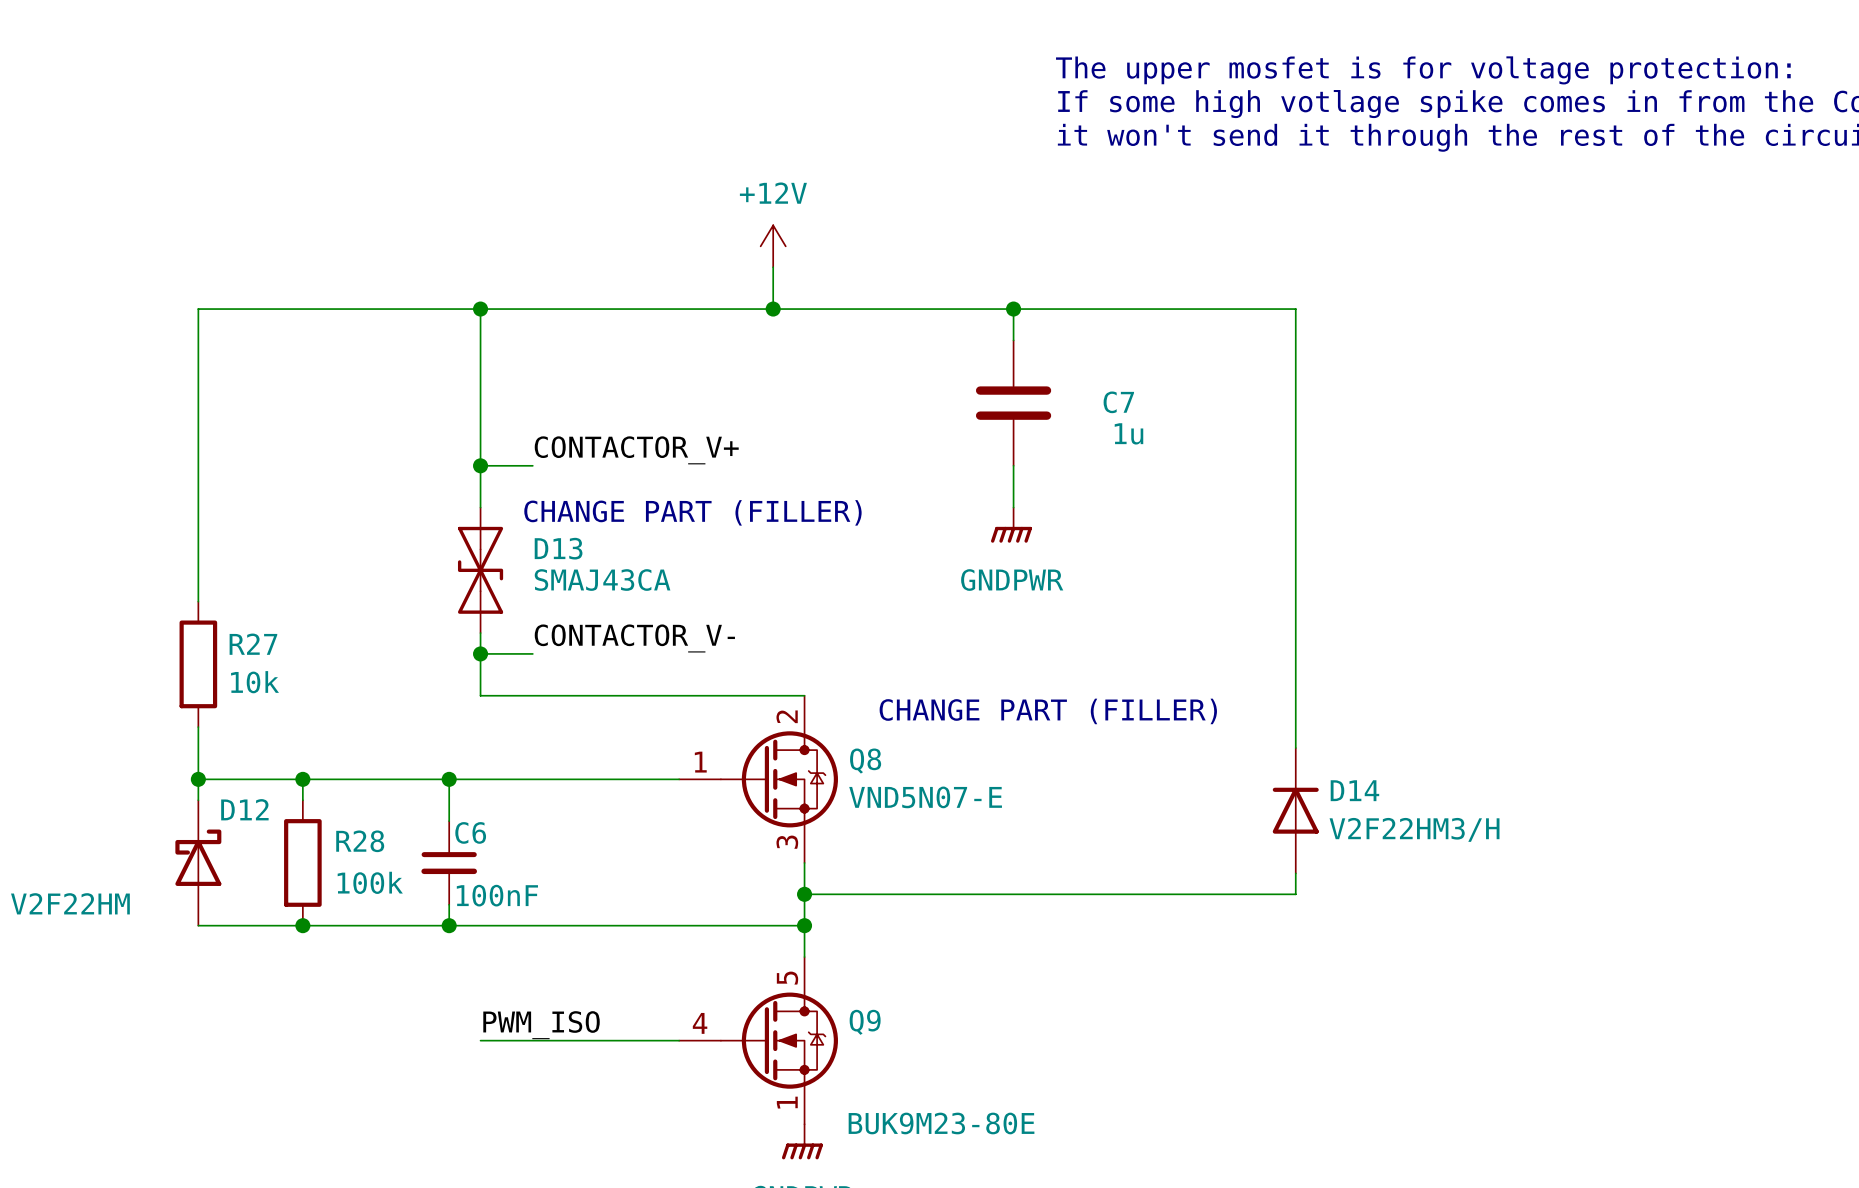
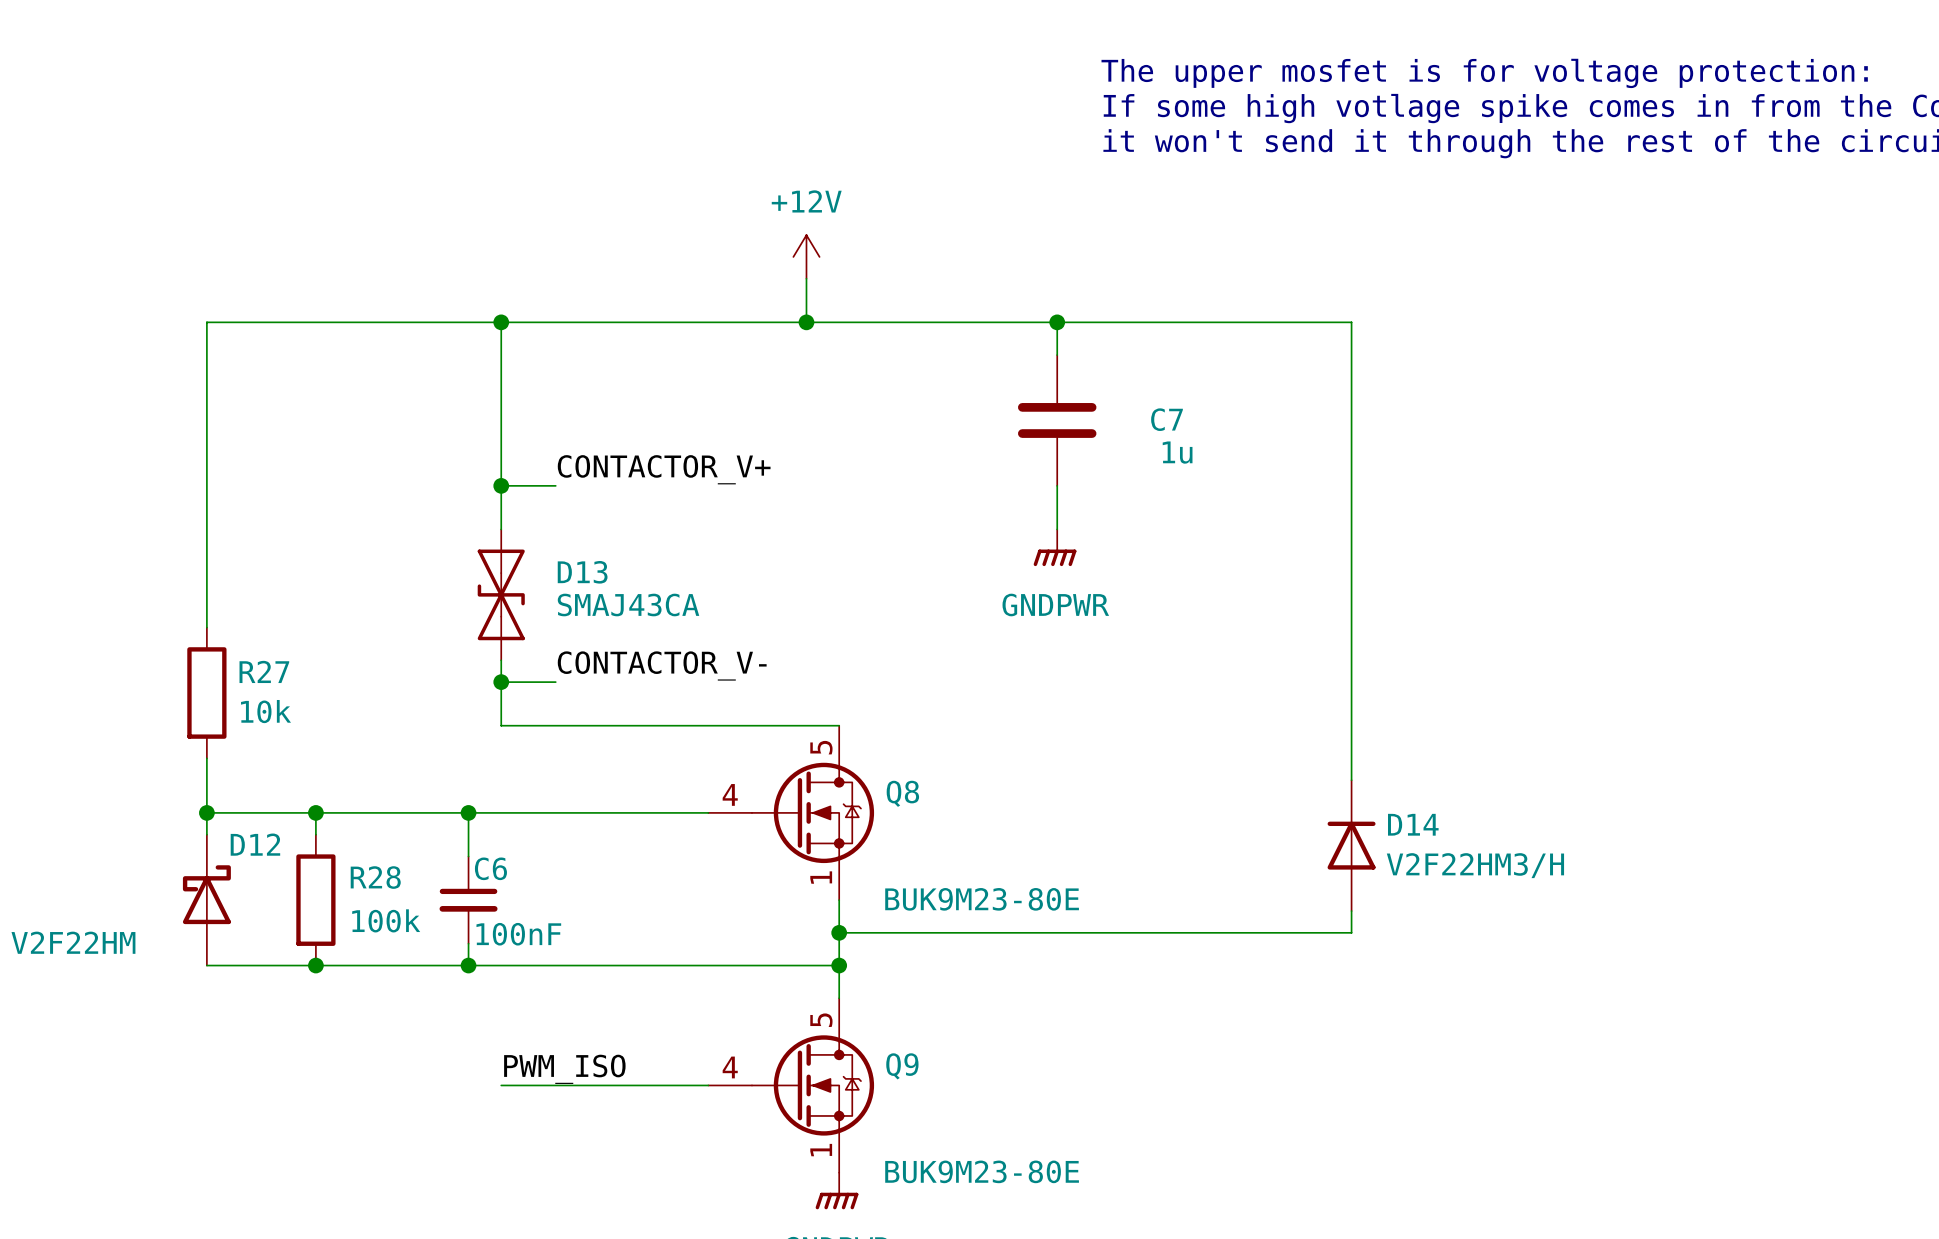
text: CHANGE PART (FILLER) (692, 512) -> none
text: CHANGE PART (FILLER) (1048, 711) -> none
Q8 pin number: 2 (787, 716) -> 5 (821, 747)
Q8 pin number: 1 (700, 762) -> 4 (730, 794)
Q8 value: VND5N07-E (925, 797) -> BUK9M23-80E (982, 899)
Q8 pin number: 3 (787, 842) -> 1 (821, 877)

